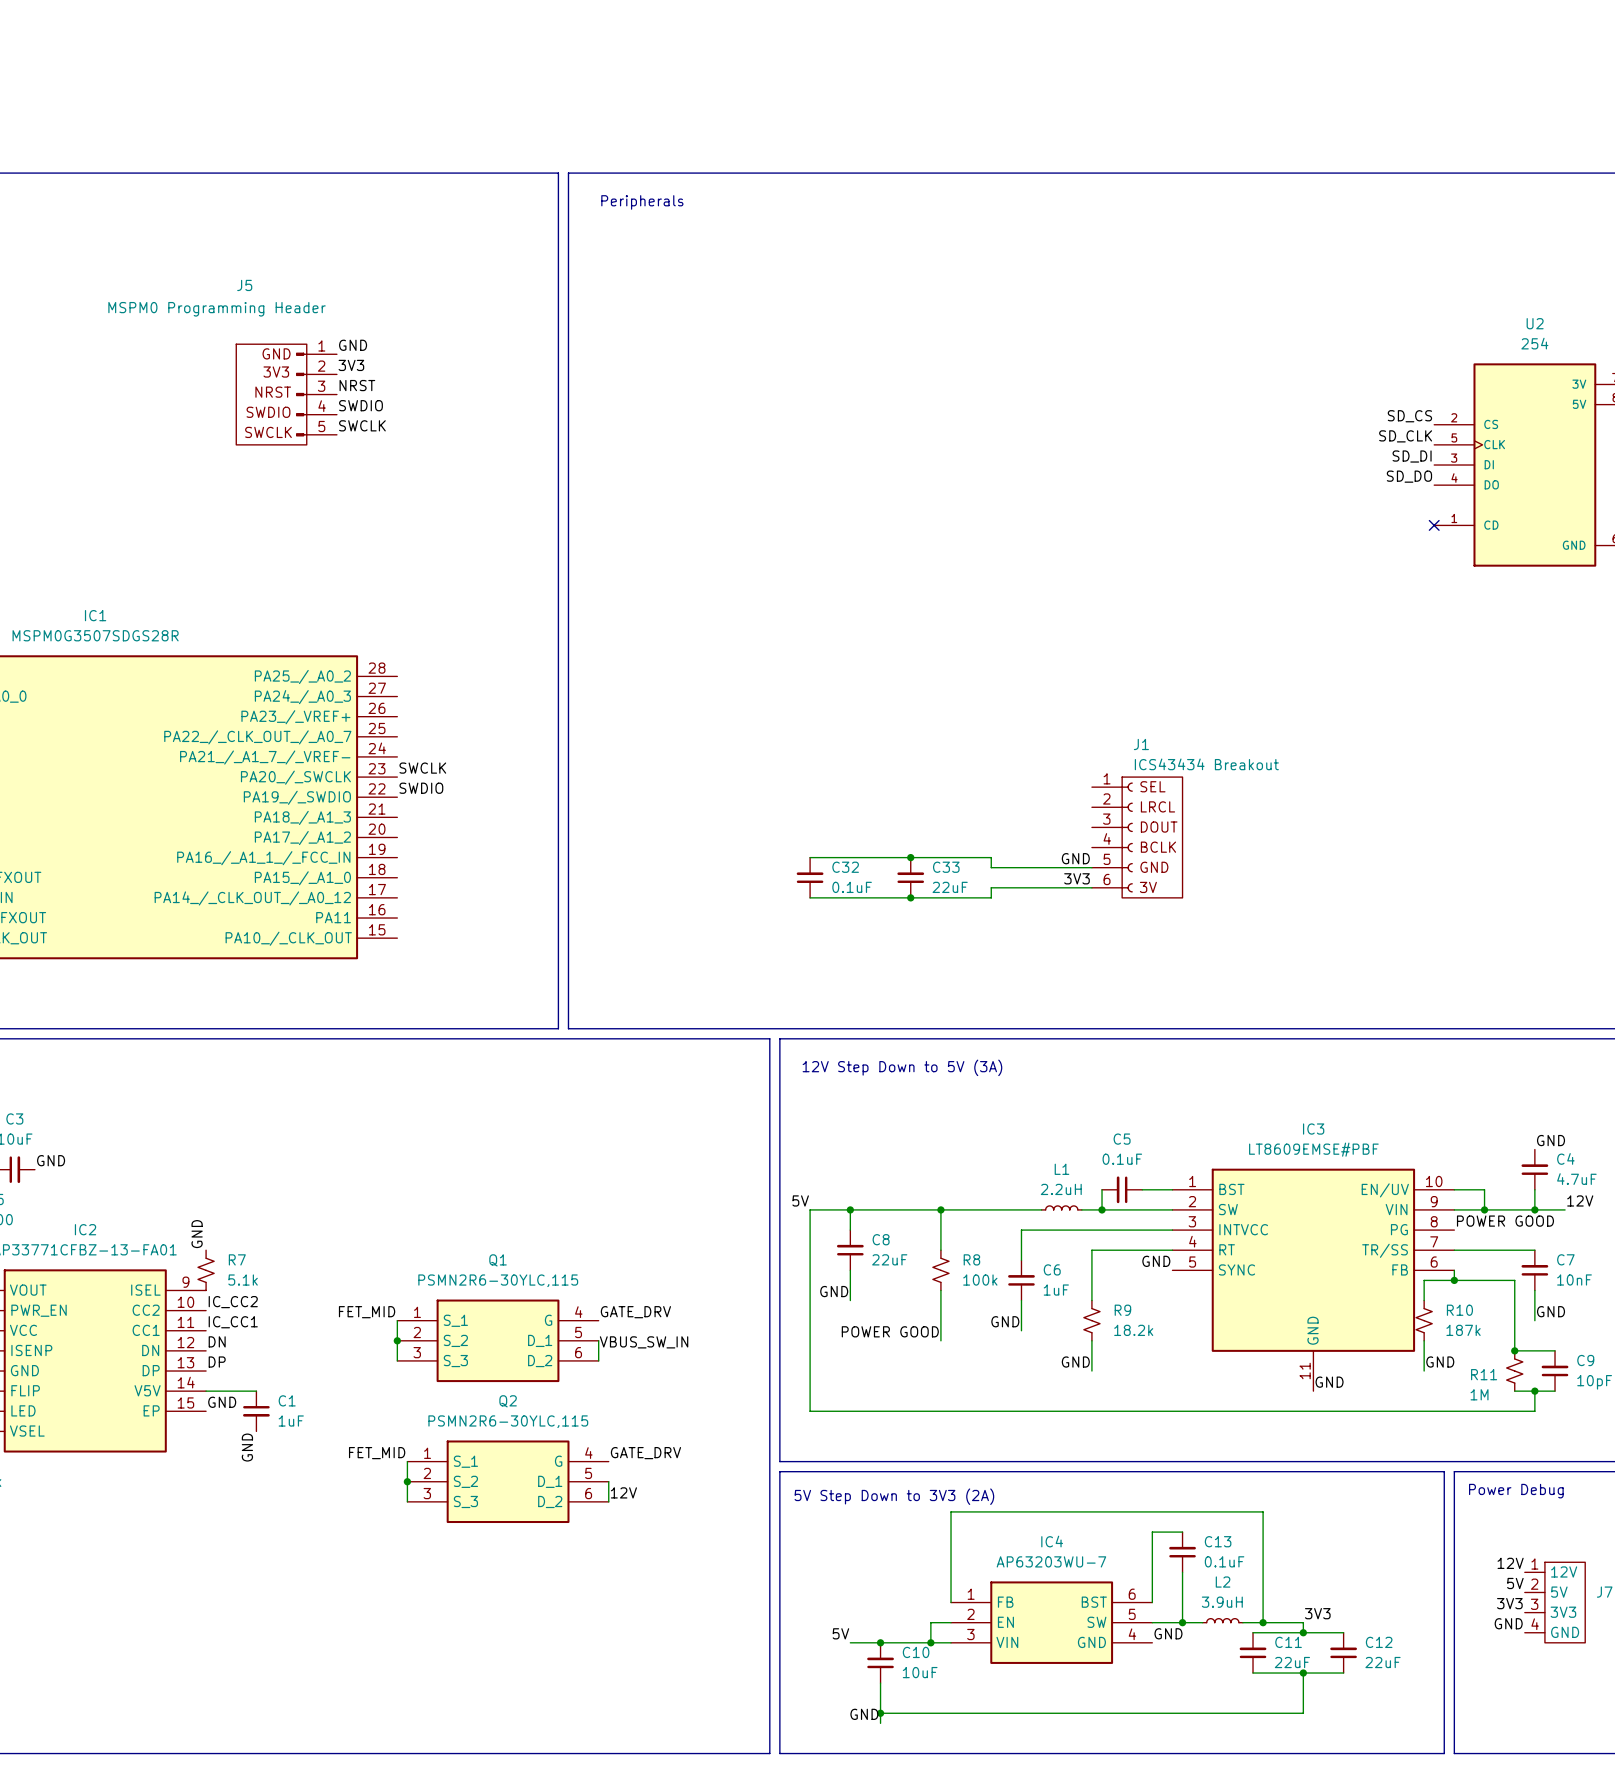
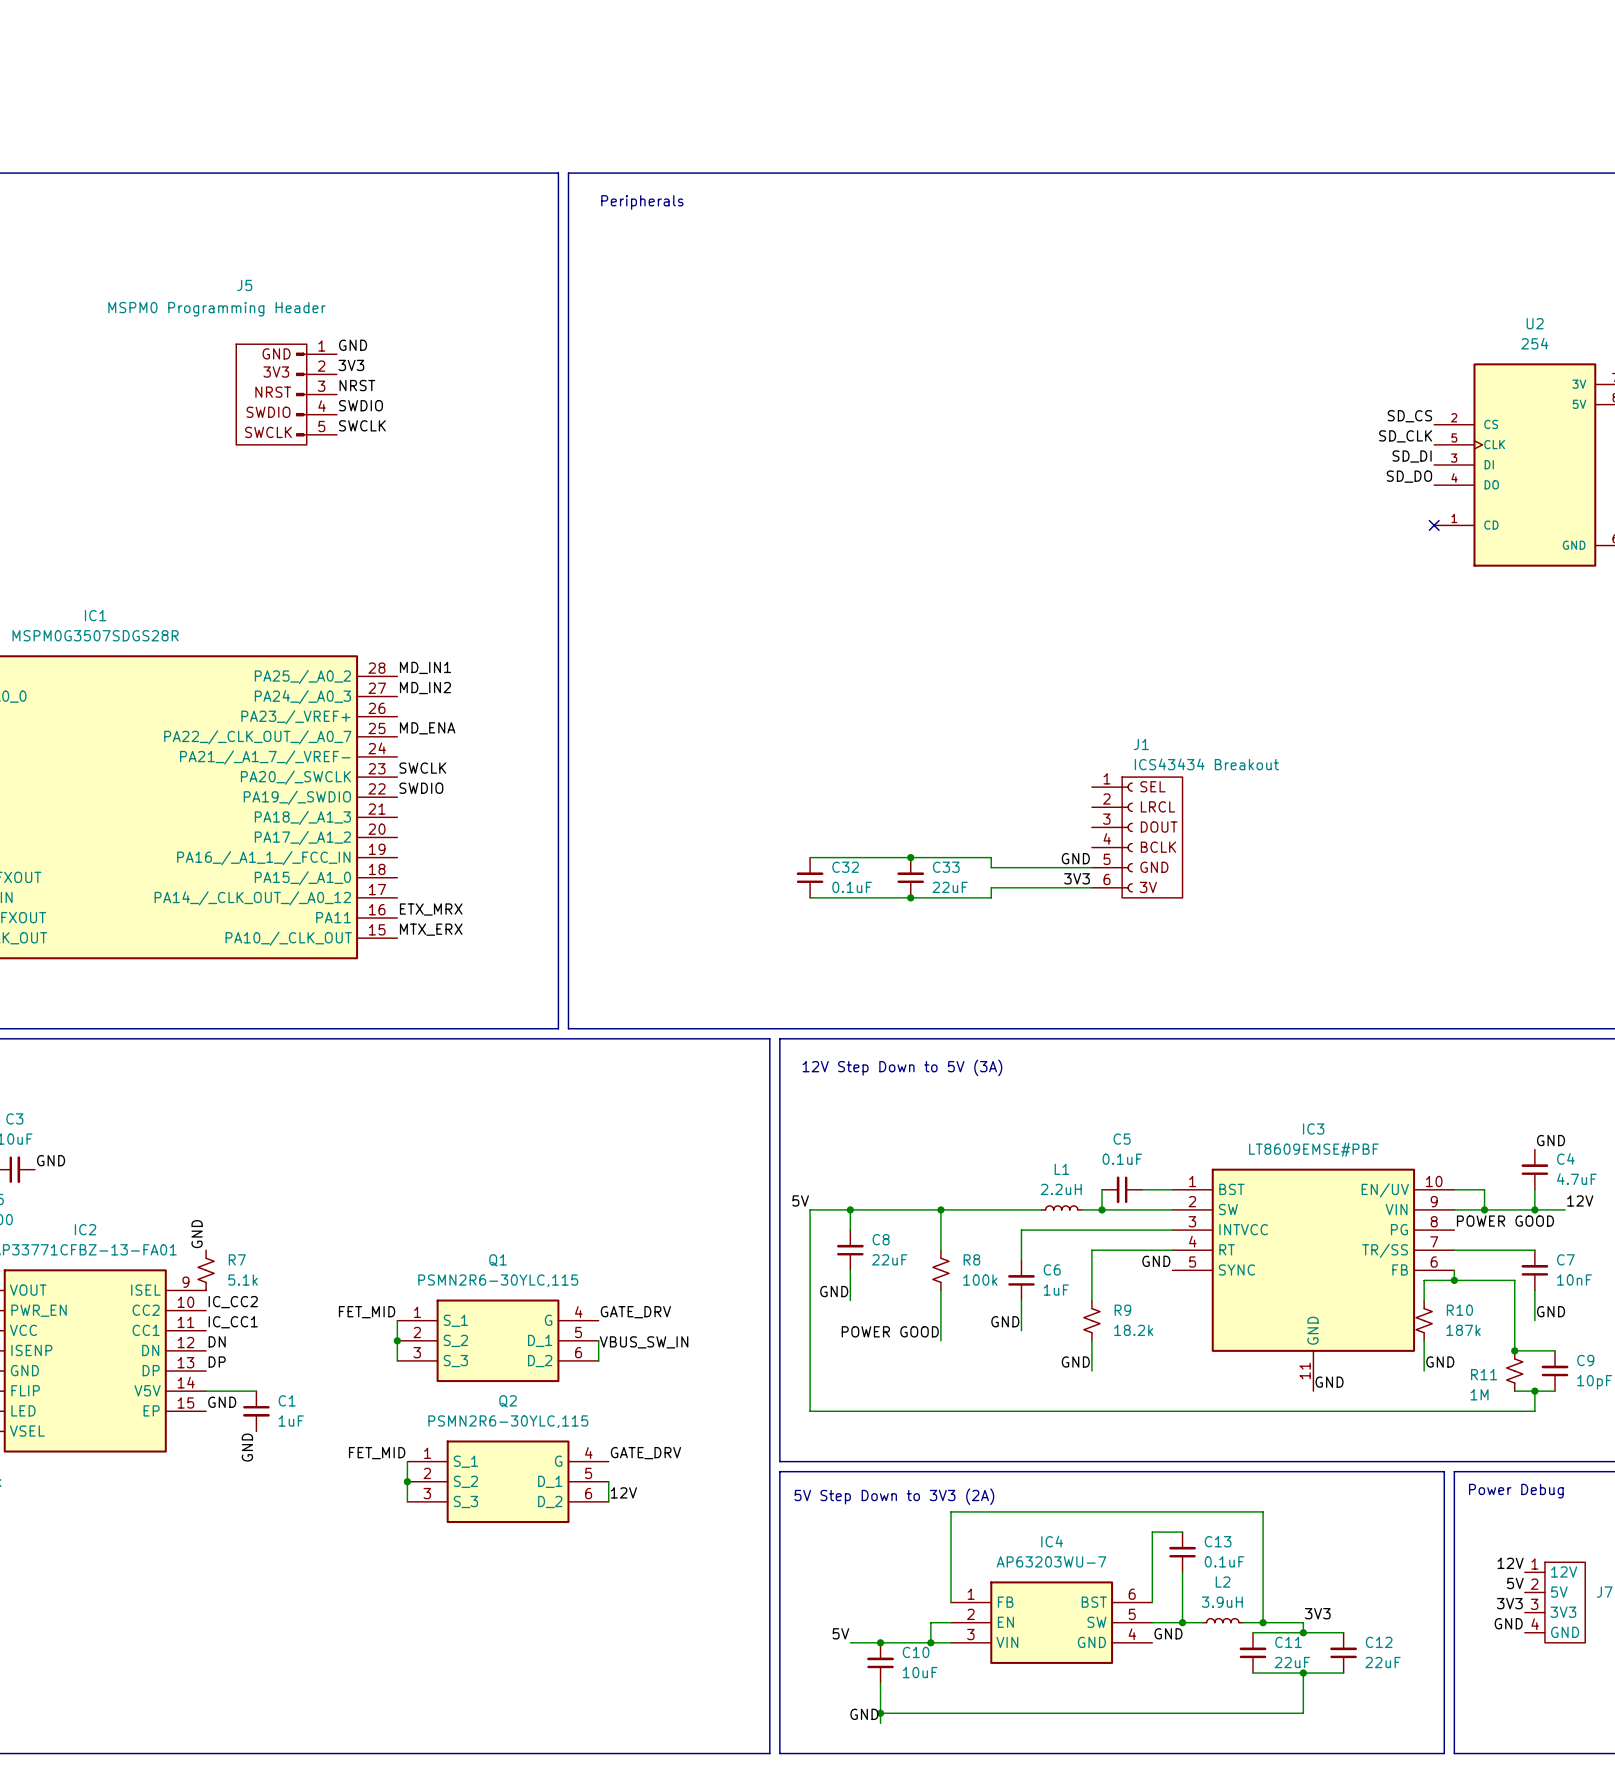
label: none -> MD_IN1 (425, 667)
label: none -> MD_IN2 (425, 688)
label: none -> MD_ENA (427, 728)
label: none -> ETX_MRX (431, 909)
label: none -> MTX_ERX (431, 929)

